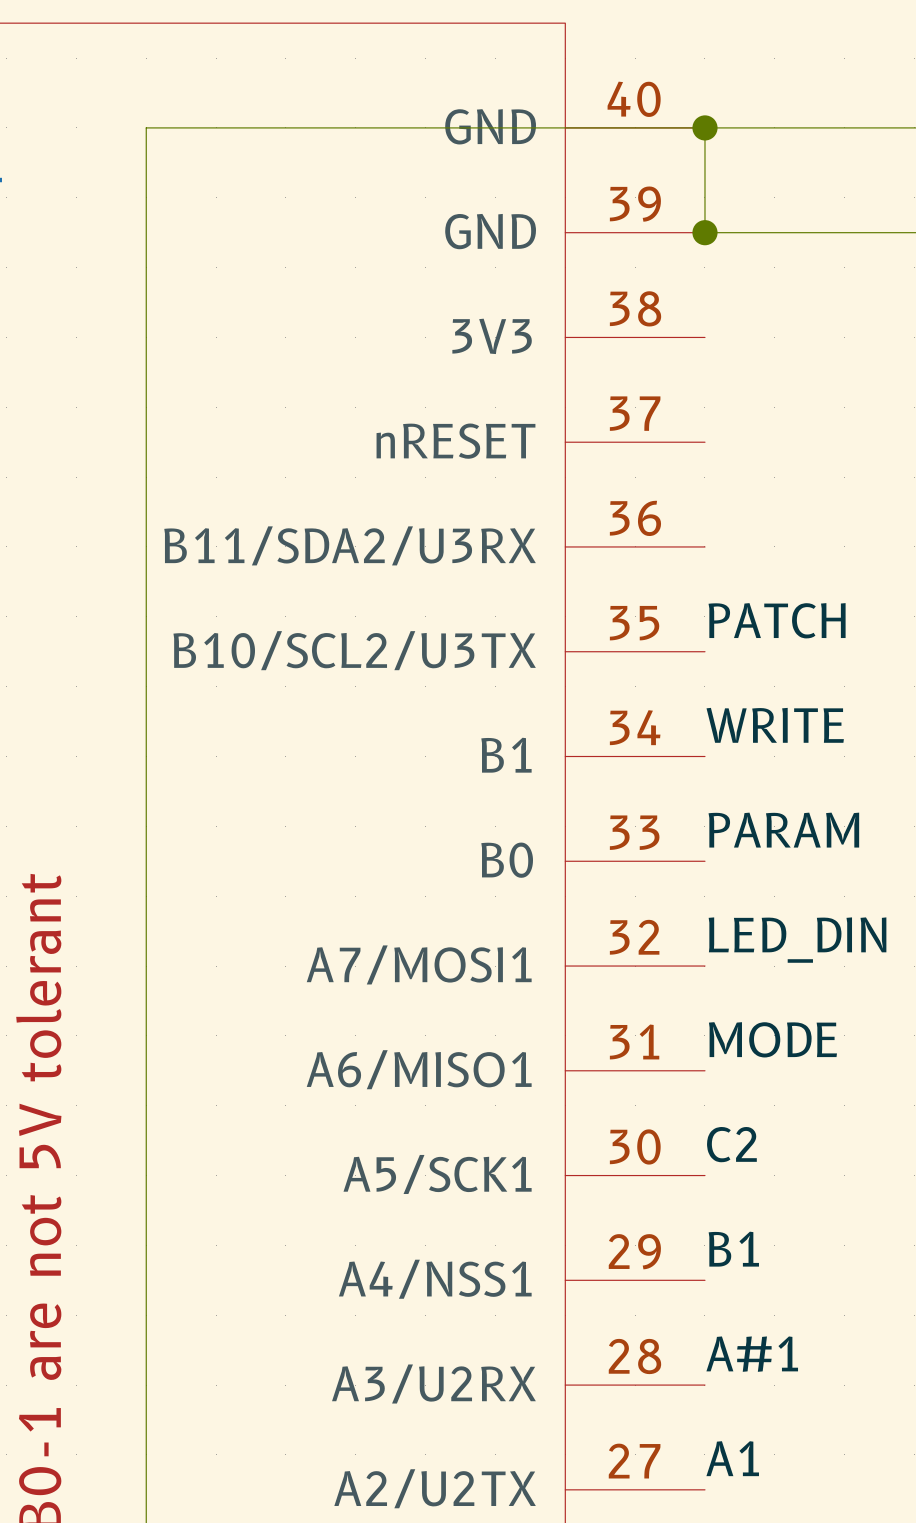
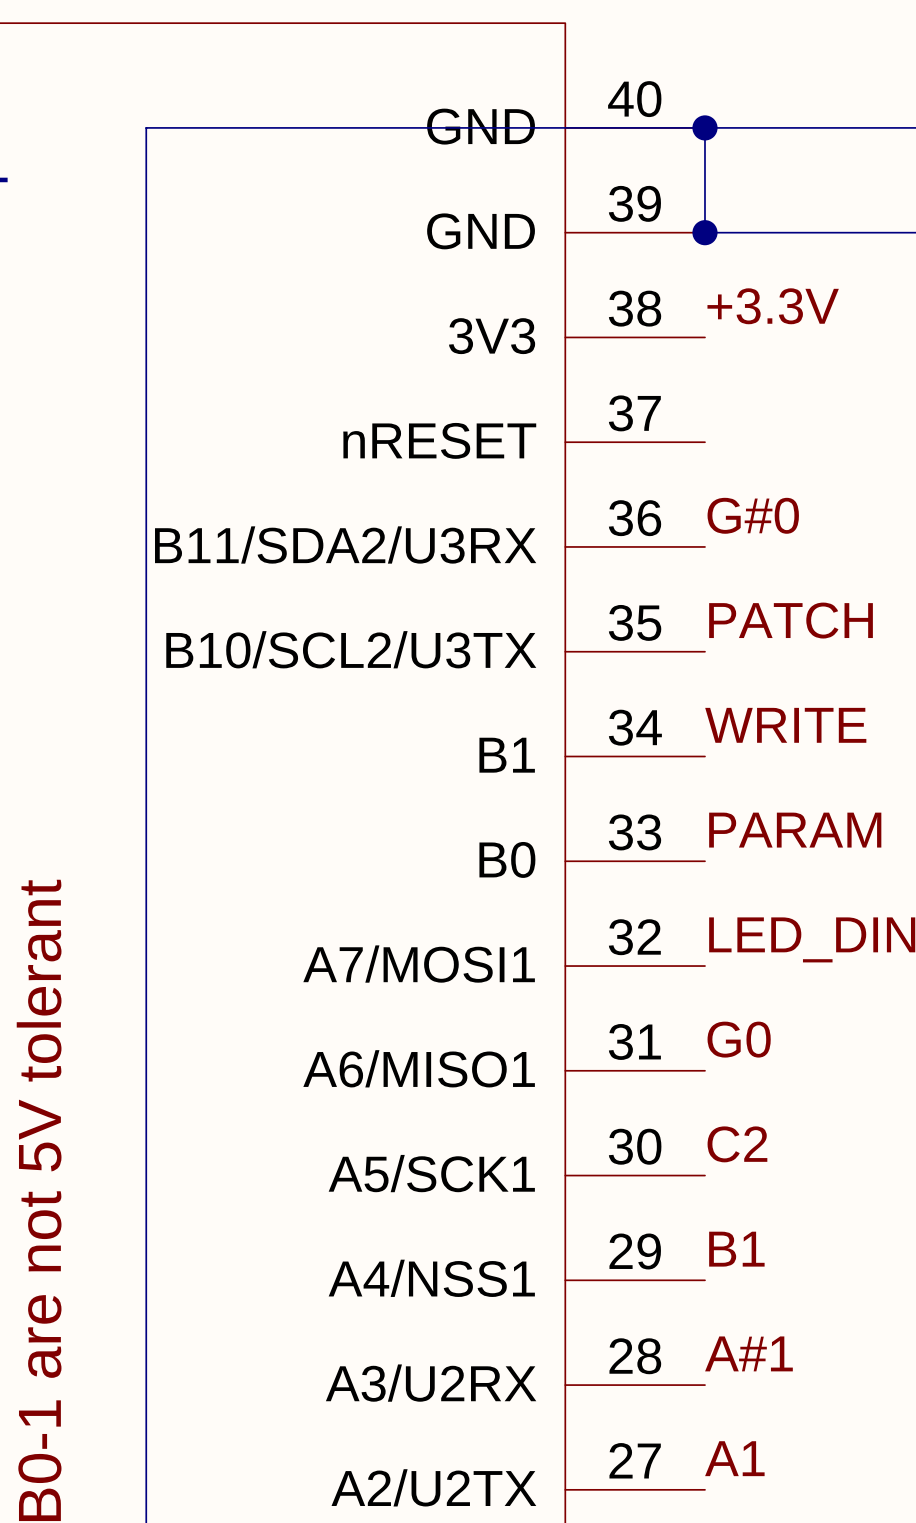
label: none -> +3.3V (773, 306)
label: none -> G#0 (753, 515)
label: MODE (772, 1039) -> G0 (739, 1039)

